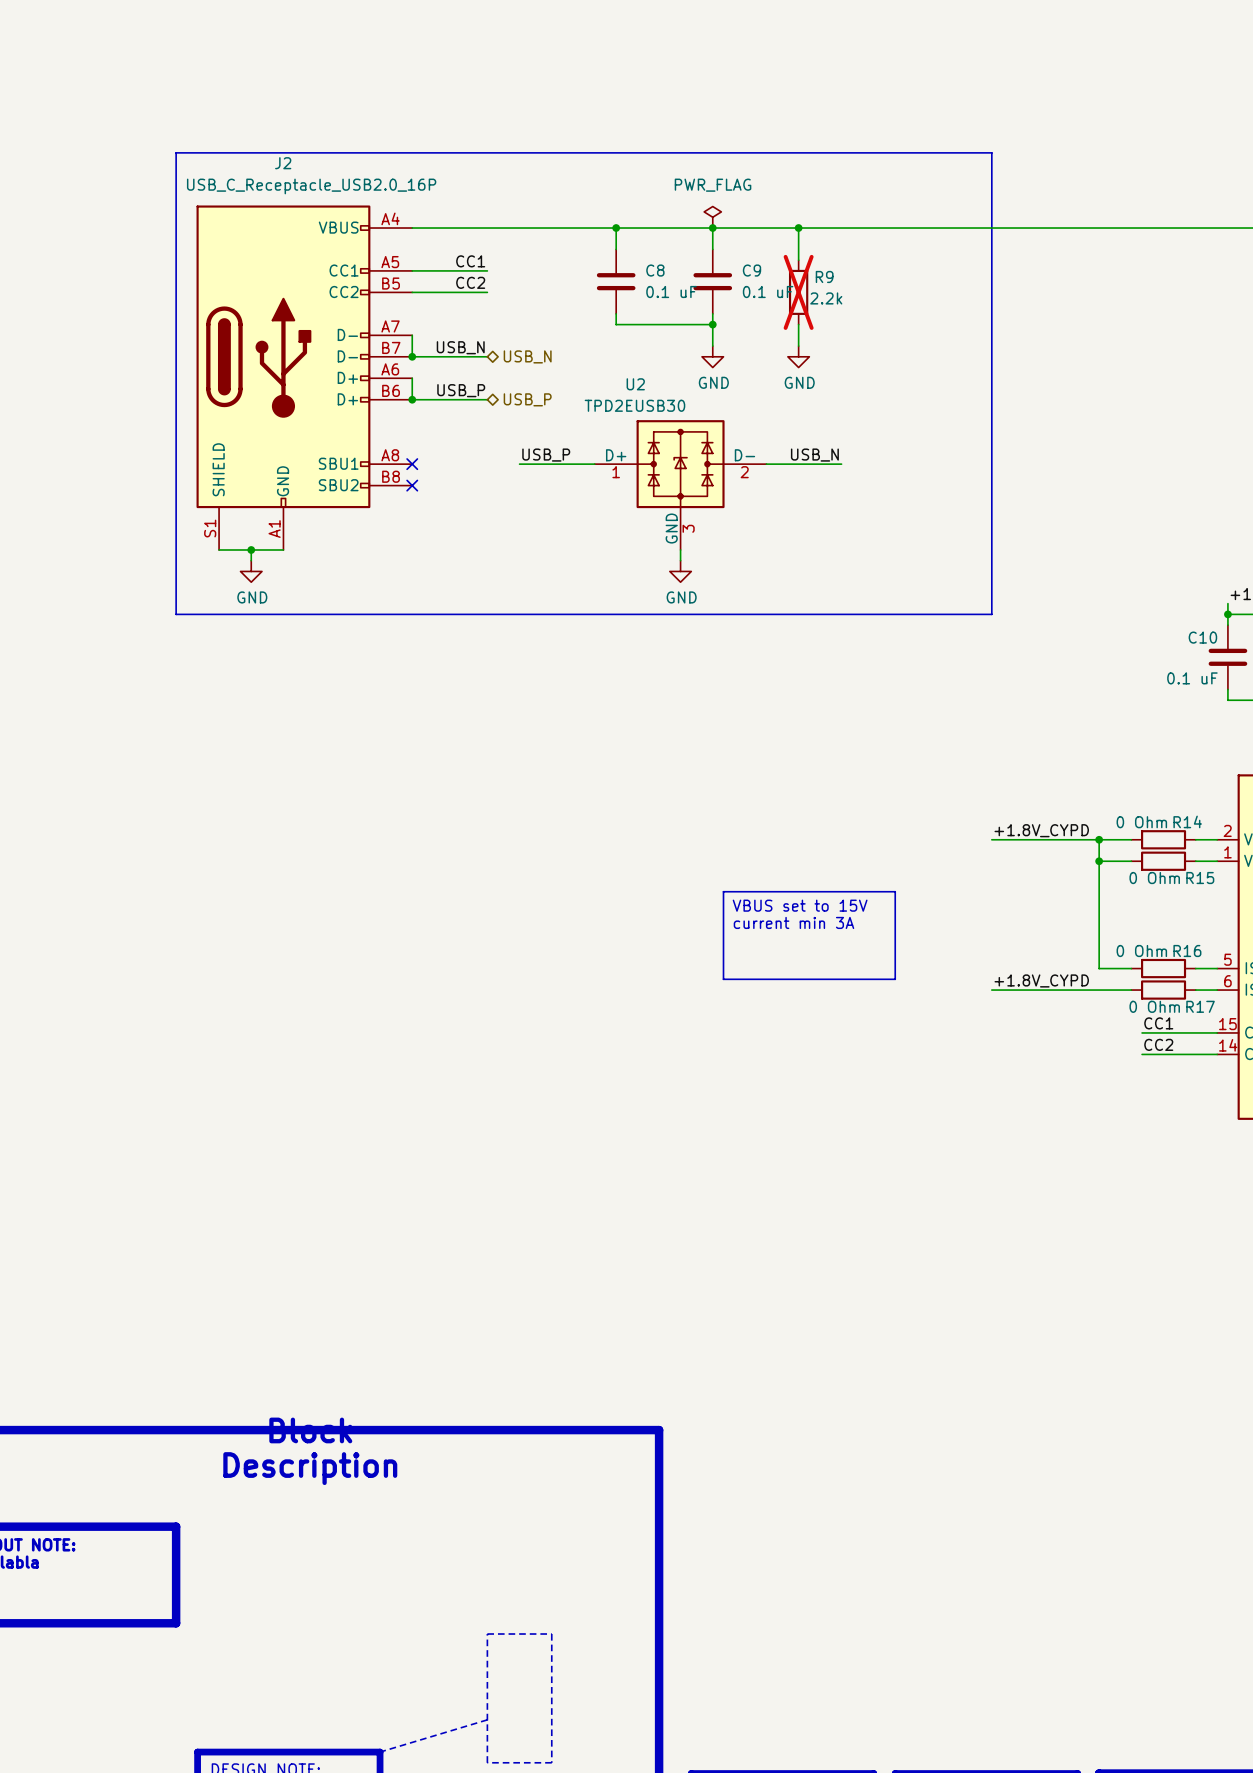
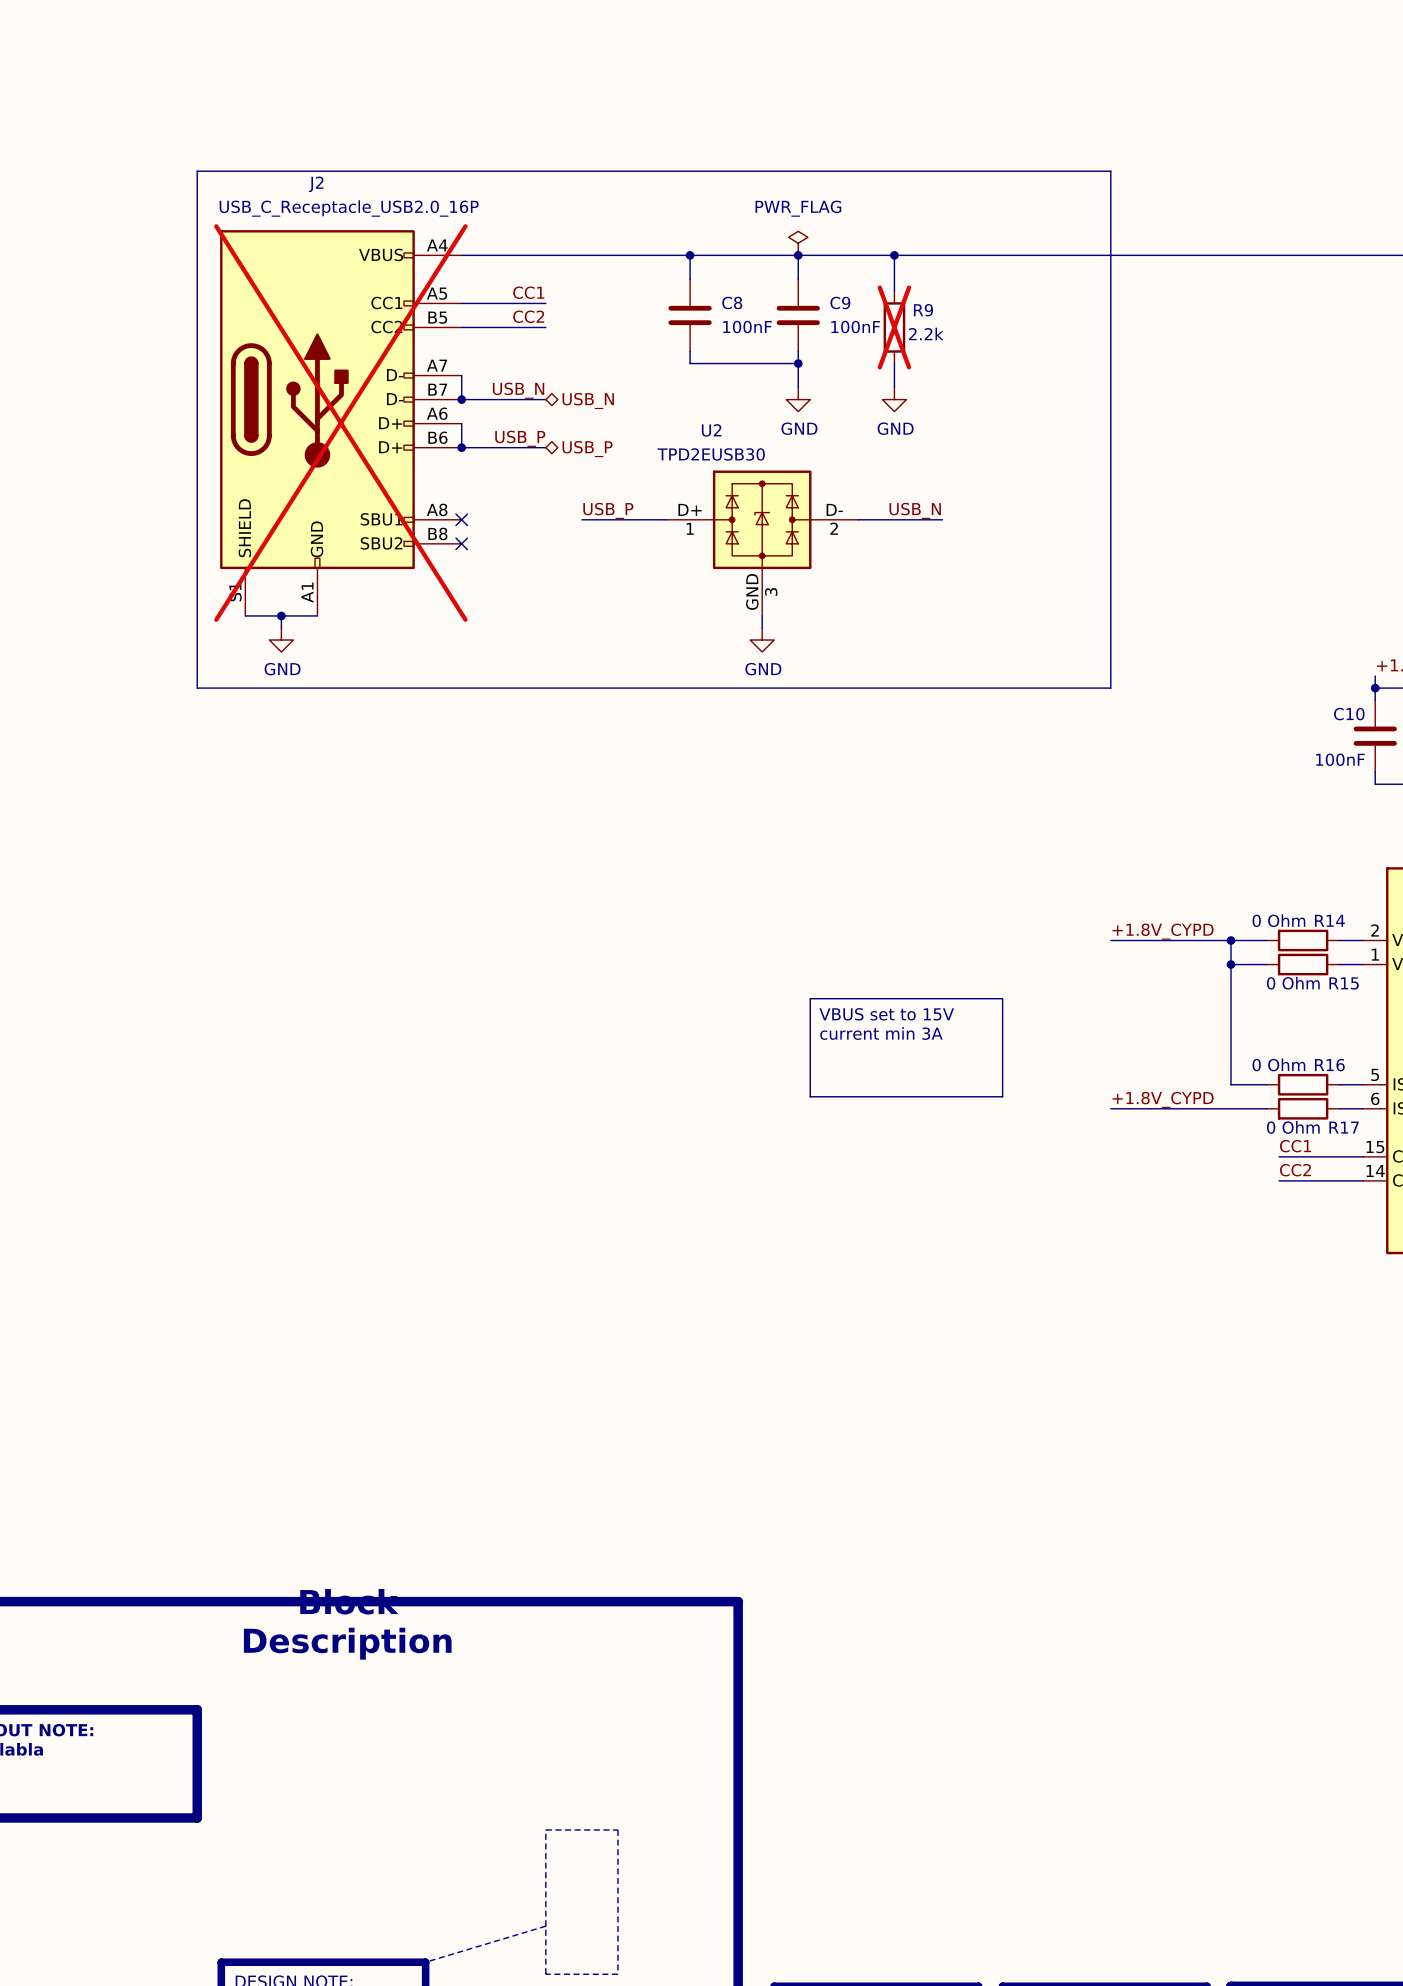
C8 value: 0.1 uF (671, 292) -> 100nF (747, 327)
C9 value: 0.1 uF (768, 292) -> 100nF (855, 327)
J2 do-not-place cross: none -> (340, 423)
C10 value: 0.1 uF (1192, 678) -> 100nF (1340, 759)

